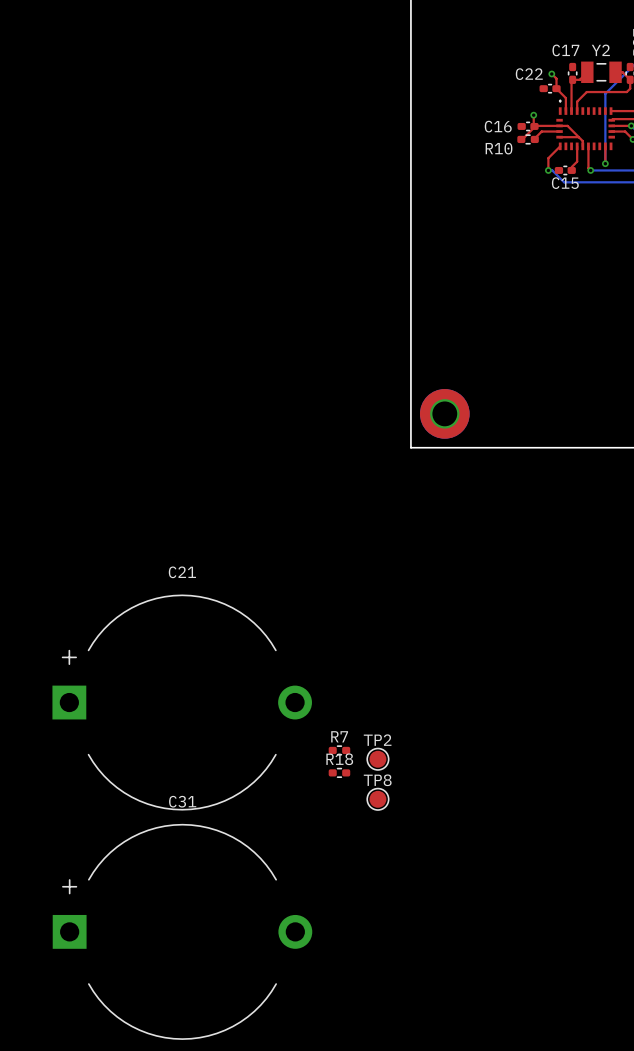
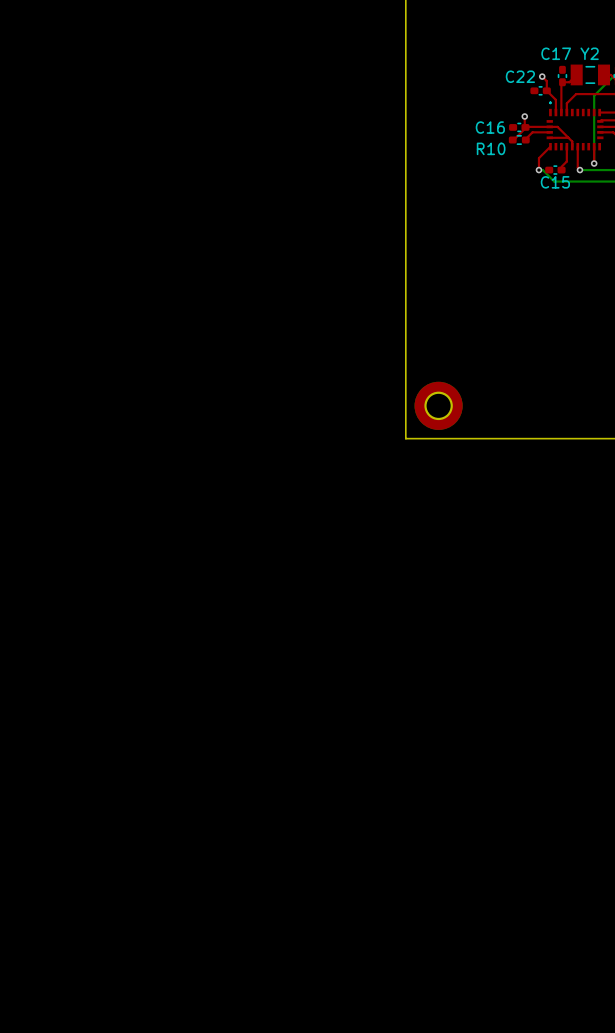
C21: (182, 702) -> none
R7: (339, 750) -> none
TP2: (377, 759) -> none
R18: (339, 772) -> none
TP8: (377, 799) -> none
C31: (182, 931) -> none

